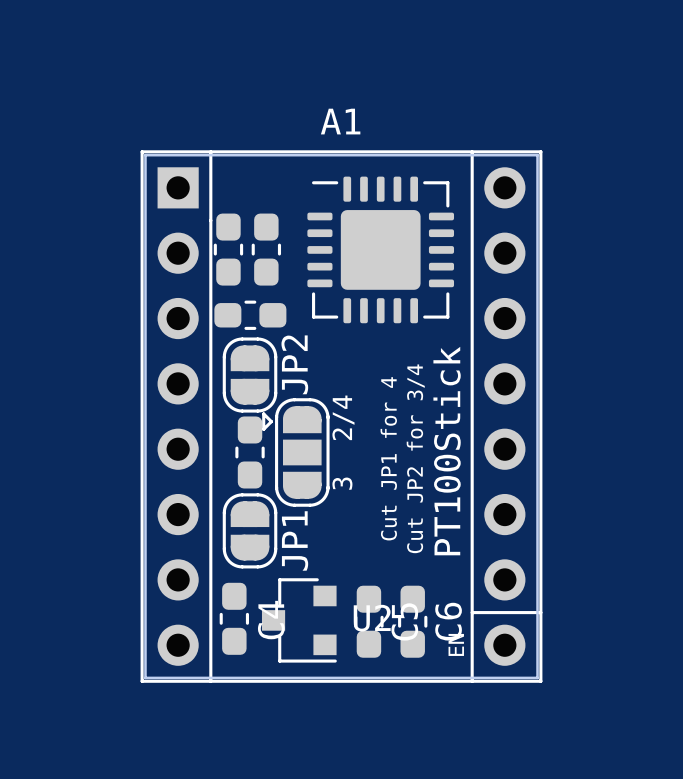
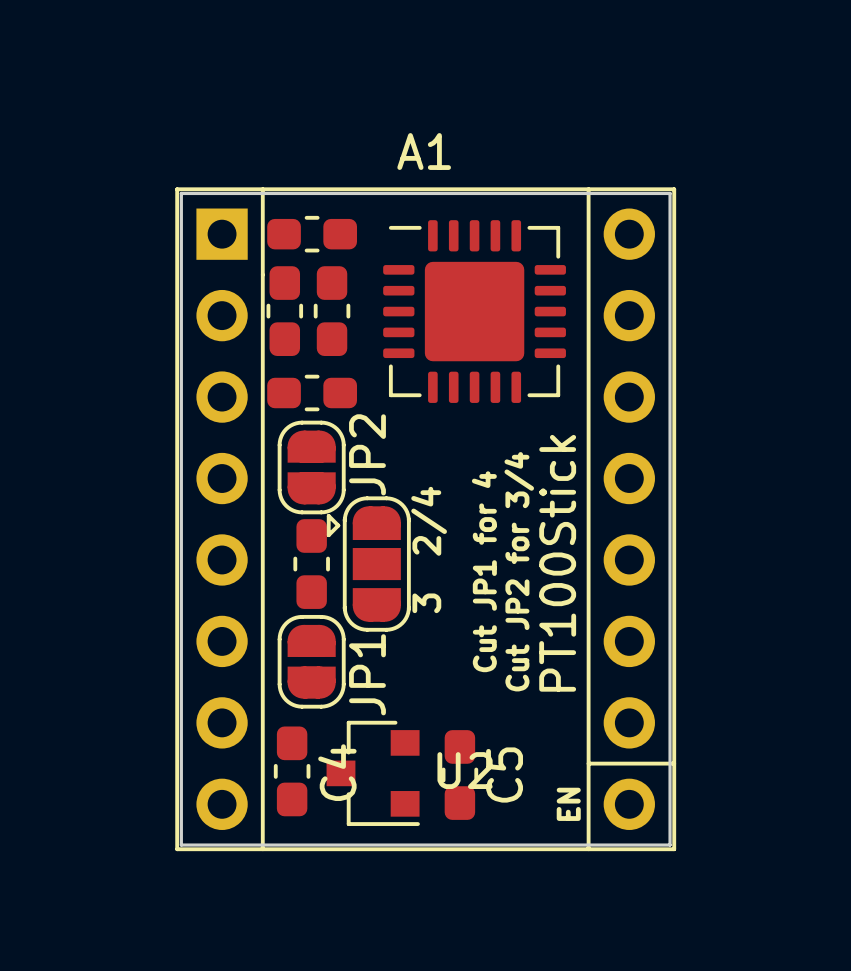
part: none -> (312, 234)
C6: (412, 621) -> none

